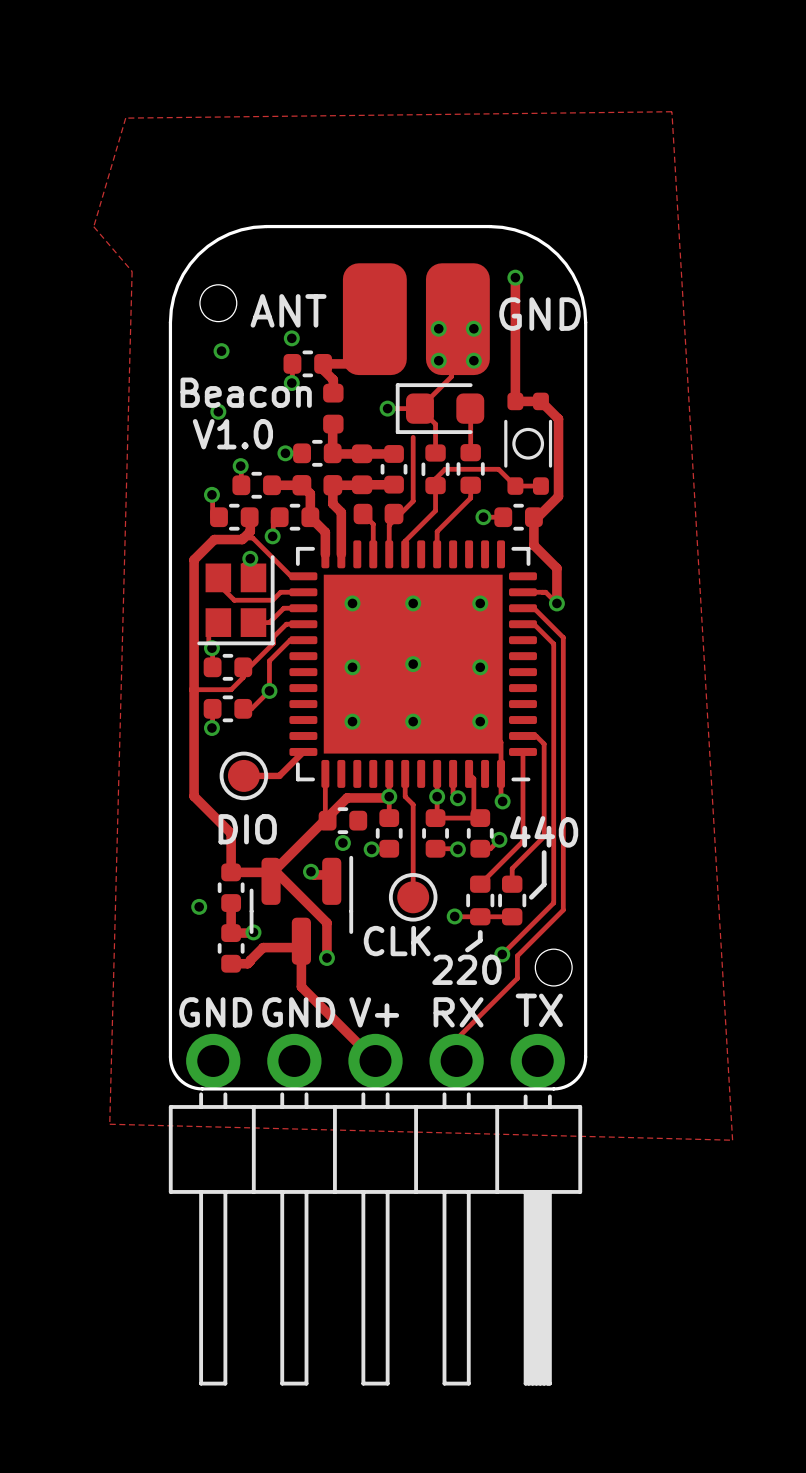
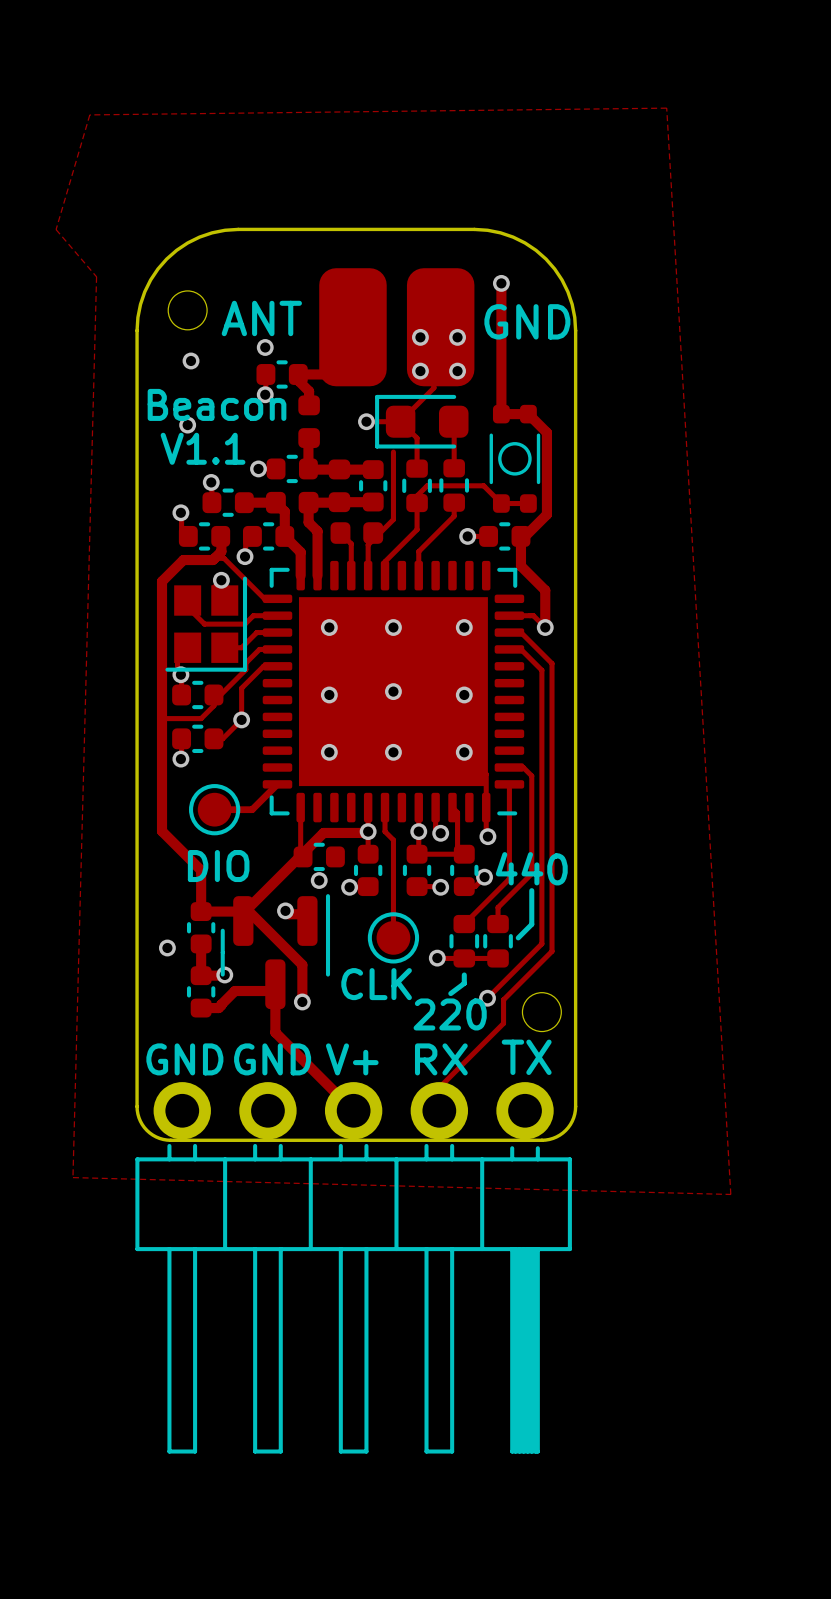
text: V1.0 (232, 434) -> V1.1 (203, 448)

